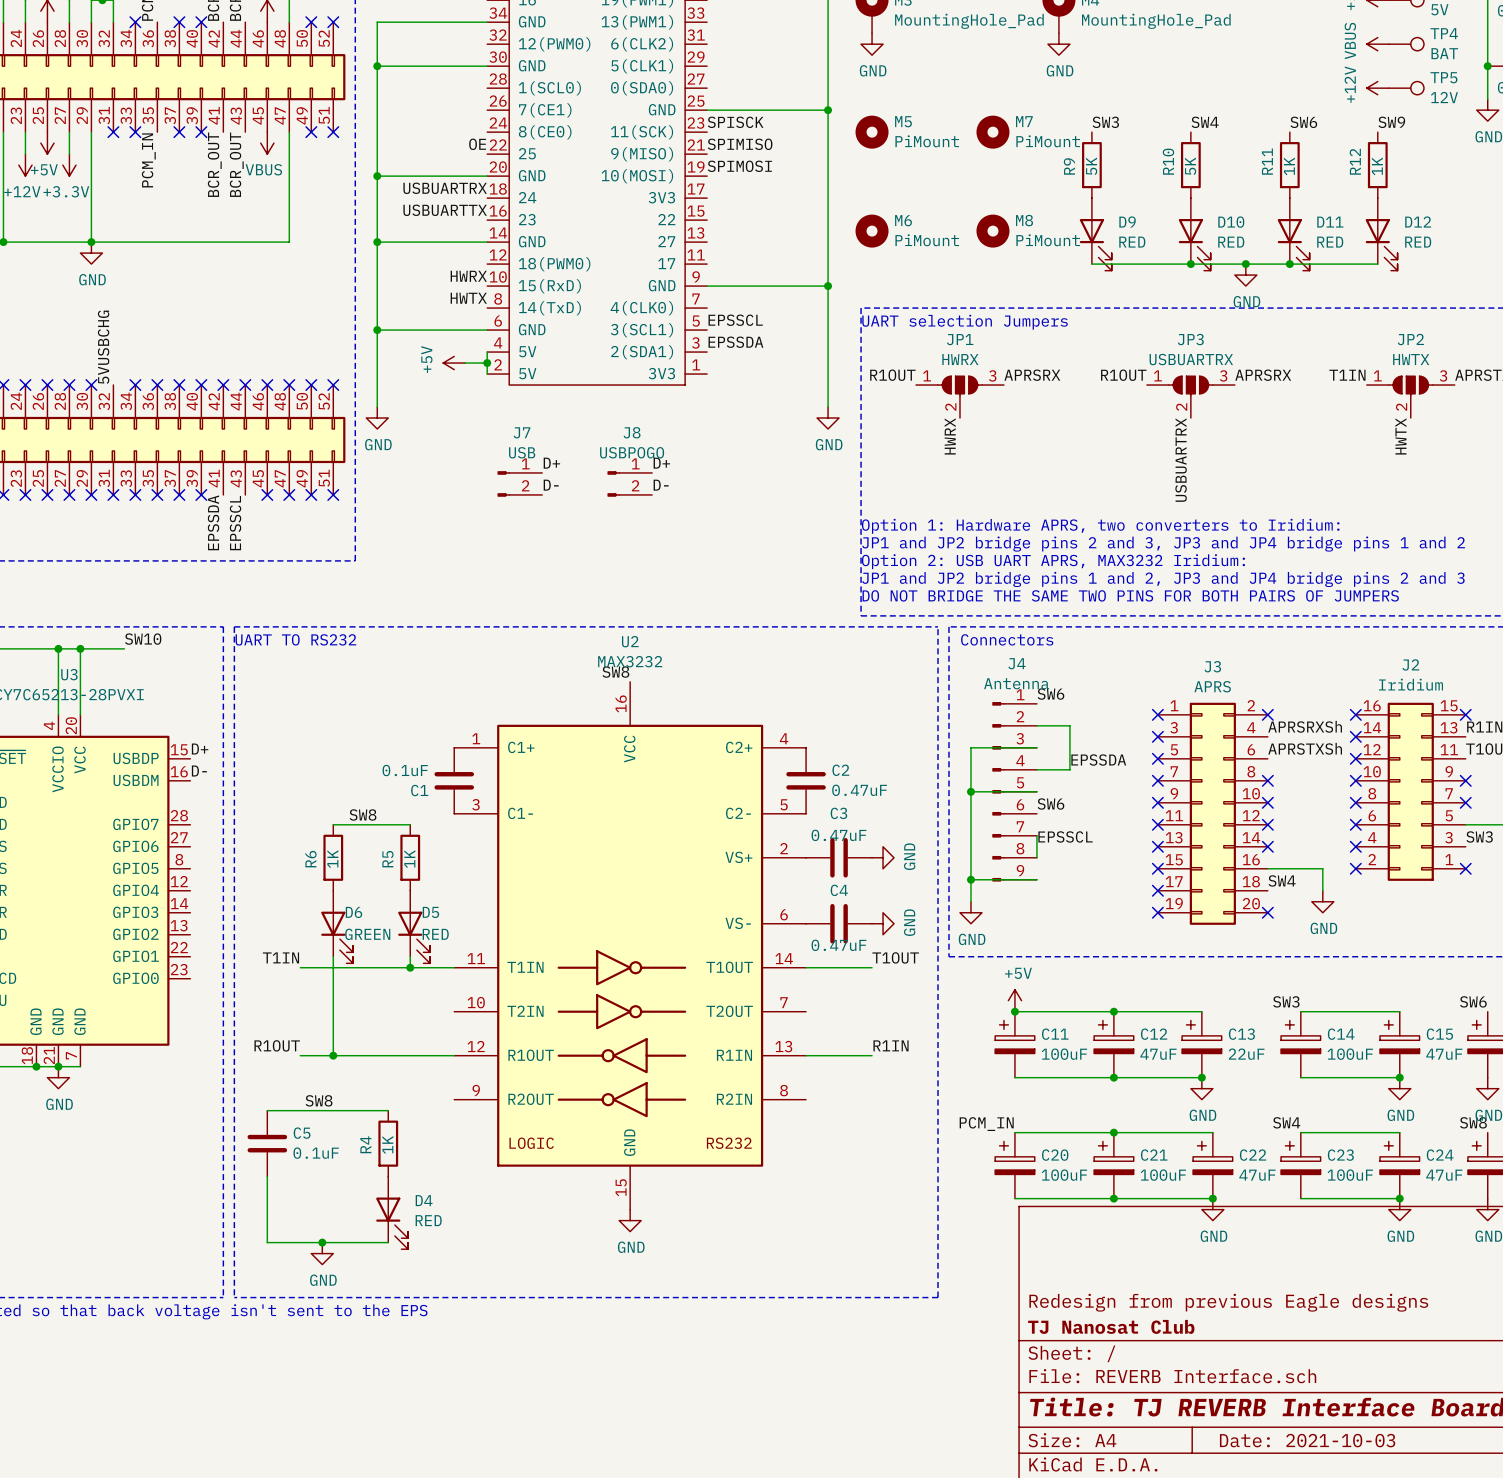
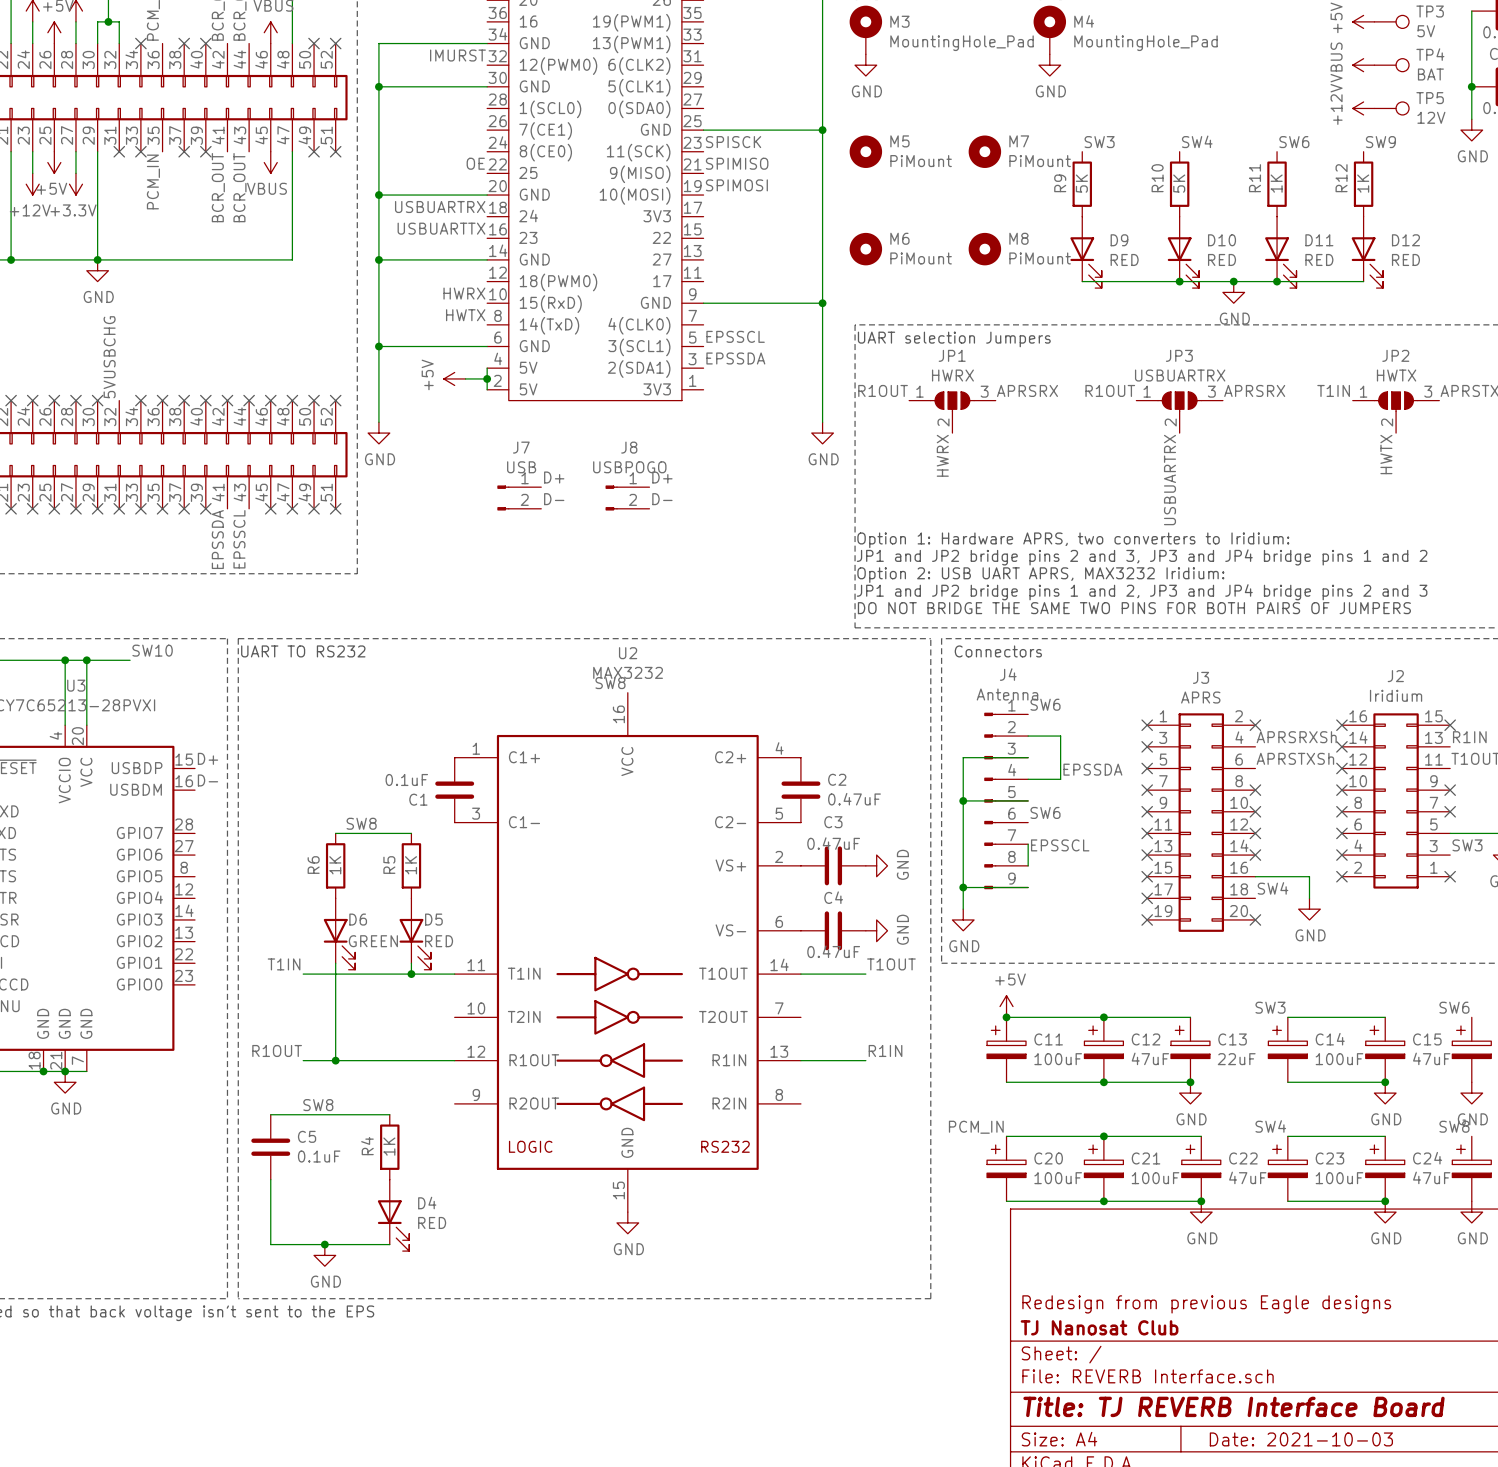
label: none -> IMURST (457, 55)

